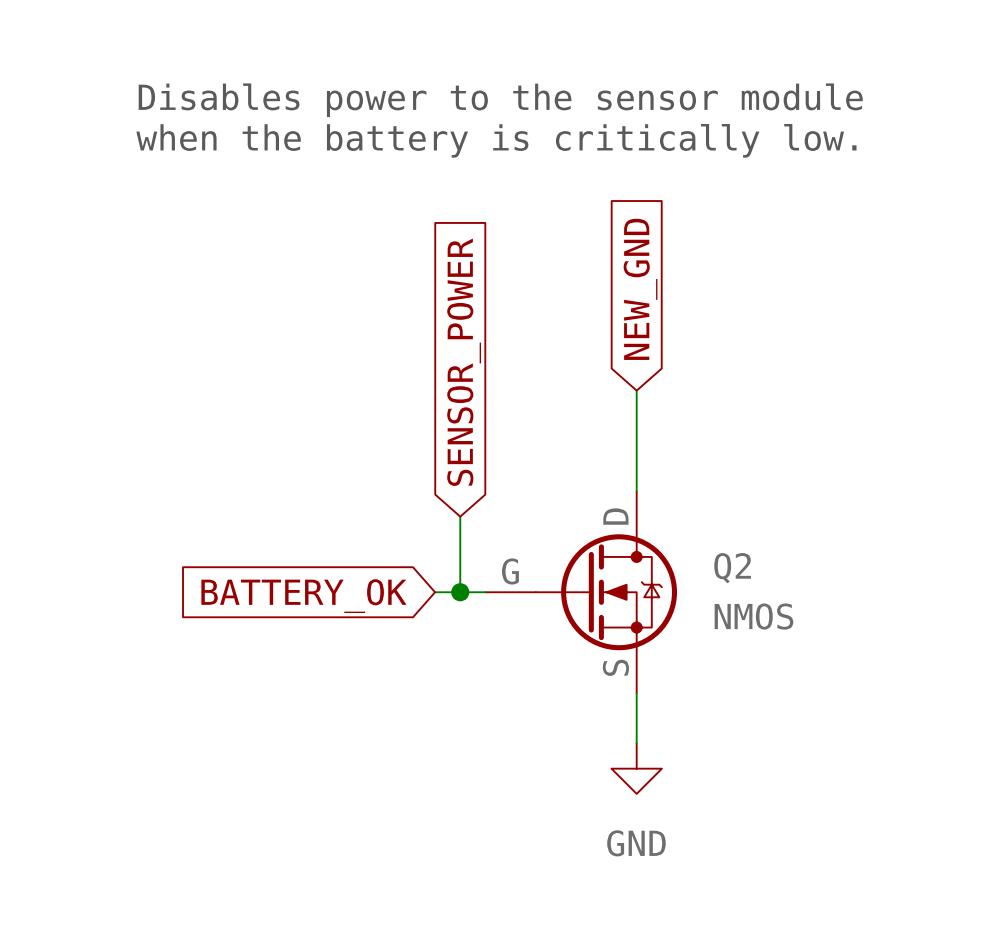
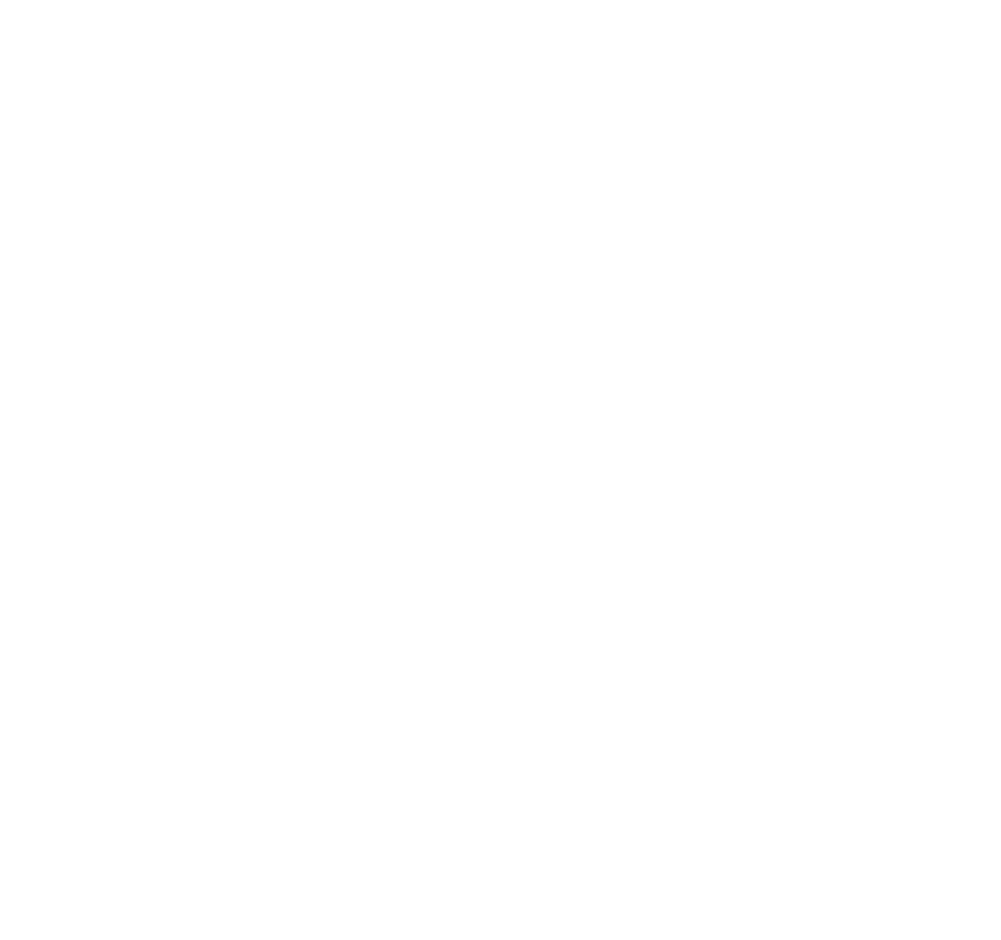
text: Disables power to the sensor module (500, 100) -> none
text: when the battery is critically low. (496, 140) -> none
global label: NEW_GND (640, 289) -> none
global label: SENSOR_POWER (464, 362) -> none
wire: (636, 390) (636, 491) -> none
wire: (460, 516) (460, 592) -> none
wire: (435, 592) (485, 592) -> none
junction: (460, 592) -> none
Q2: NMOS (581, 592) -> none
global label: BATTERY_OK (303, 596) -> none
wire: (636, 693) (636, 743) -> none
power symbol: GND (636, 768) -> none

